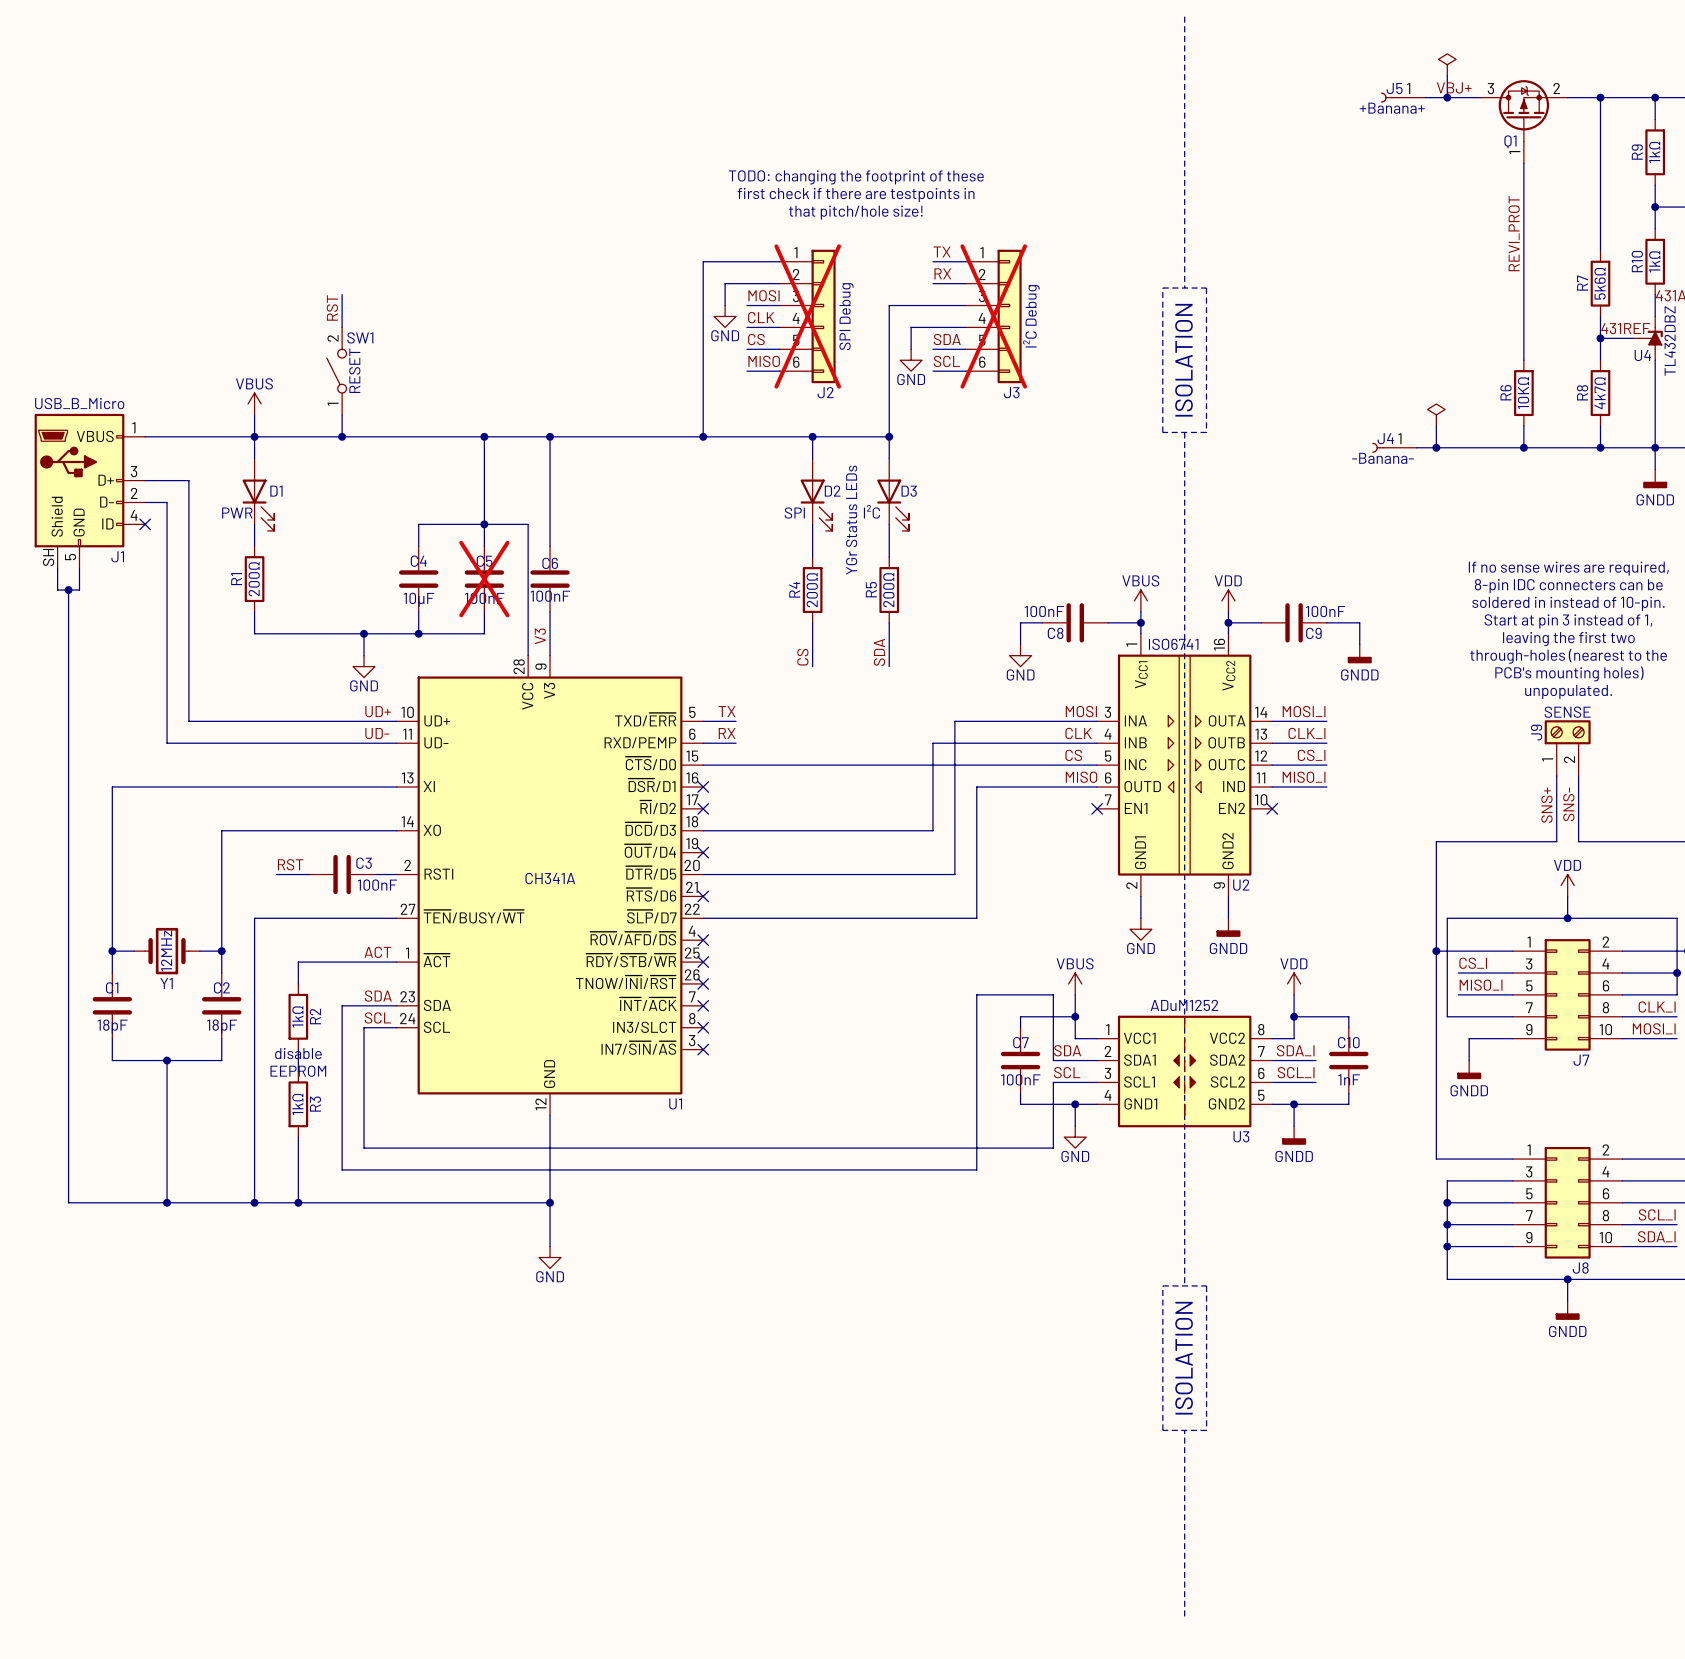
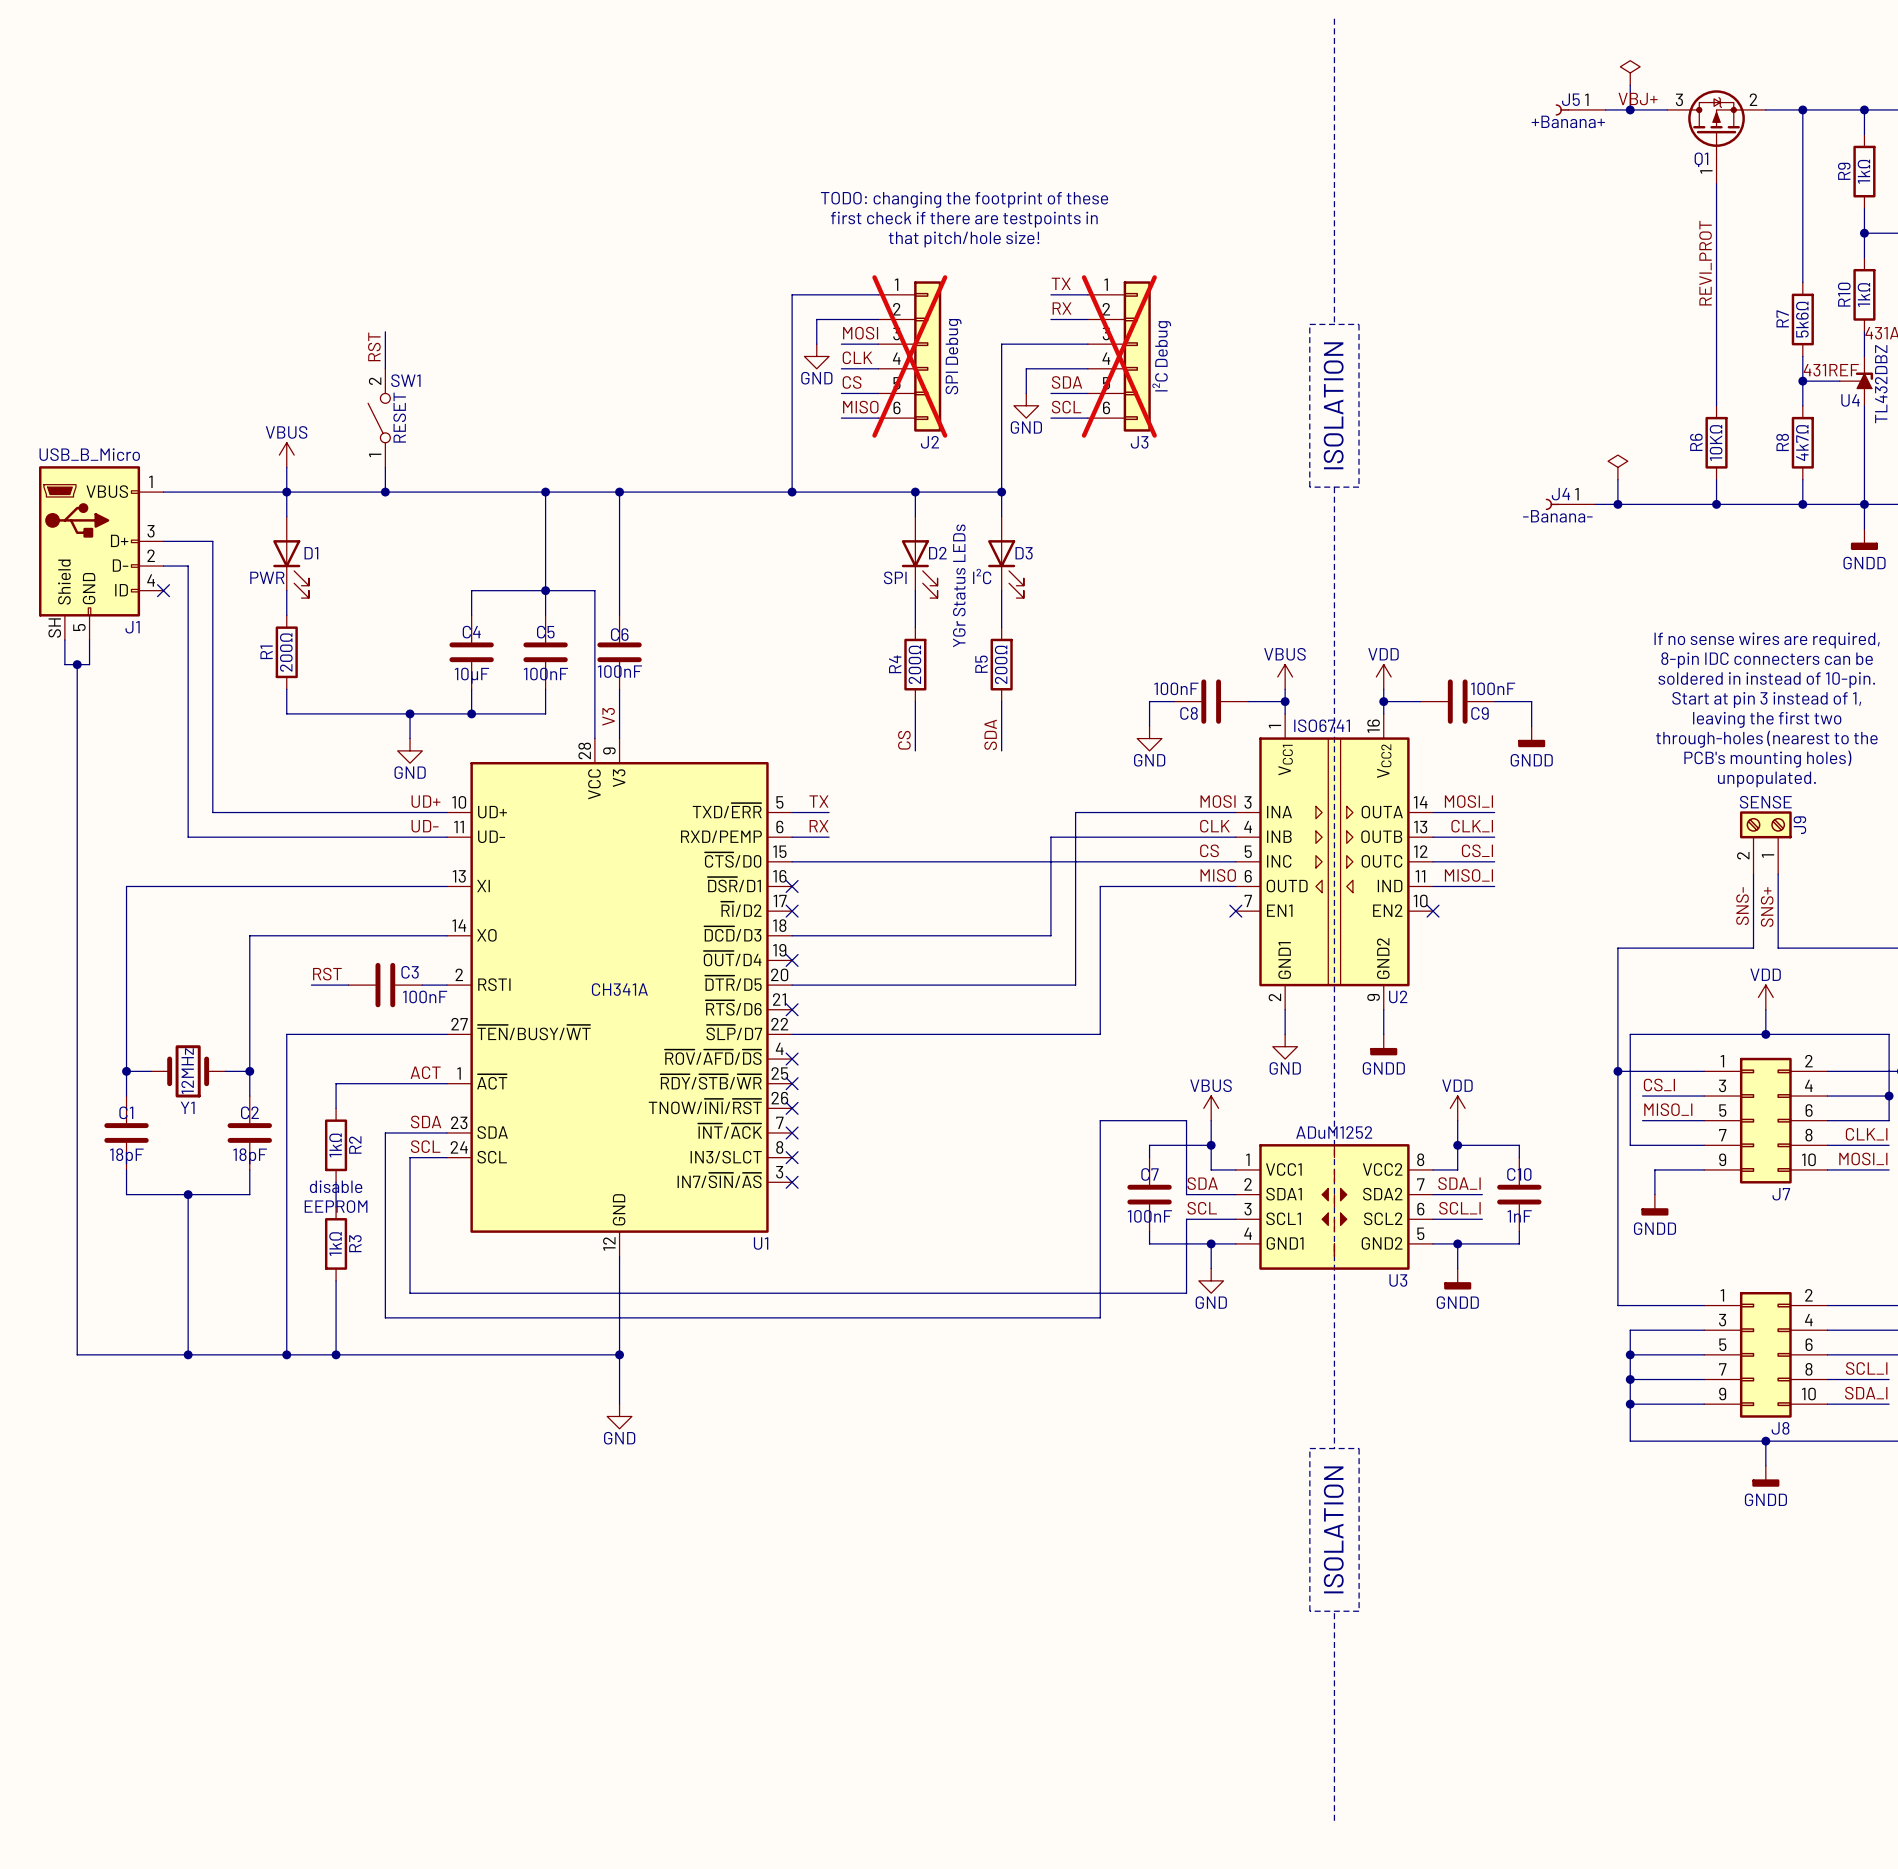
C5 do-not-place cross: (484, 579) -> none
J9 flip: as is (1567, 732) -> left-right (1765, 824)
label: SNS- (1568, 804) -> SNS+ (1767, 907)
label: SNS+ (1546, 805) -> SNS- (1742, 906)

